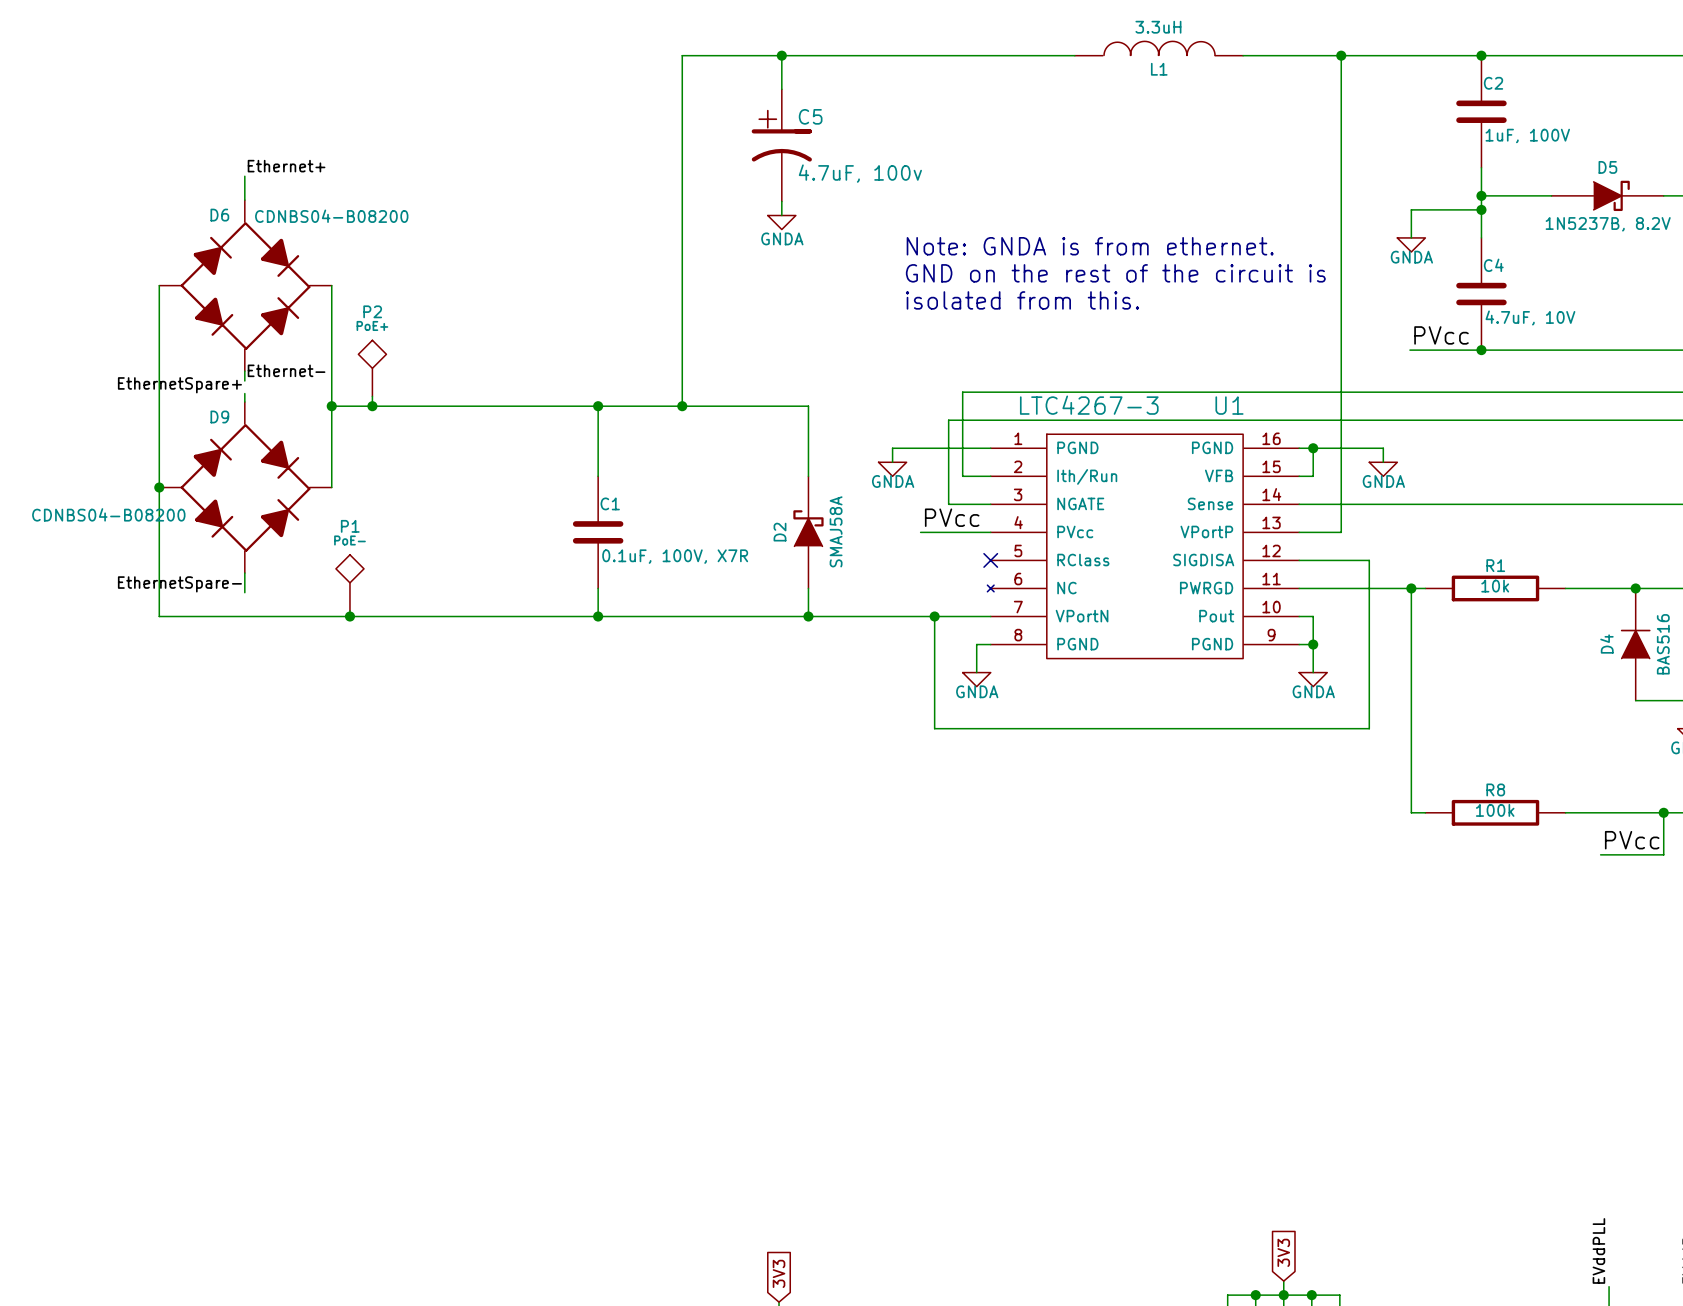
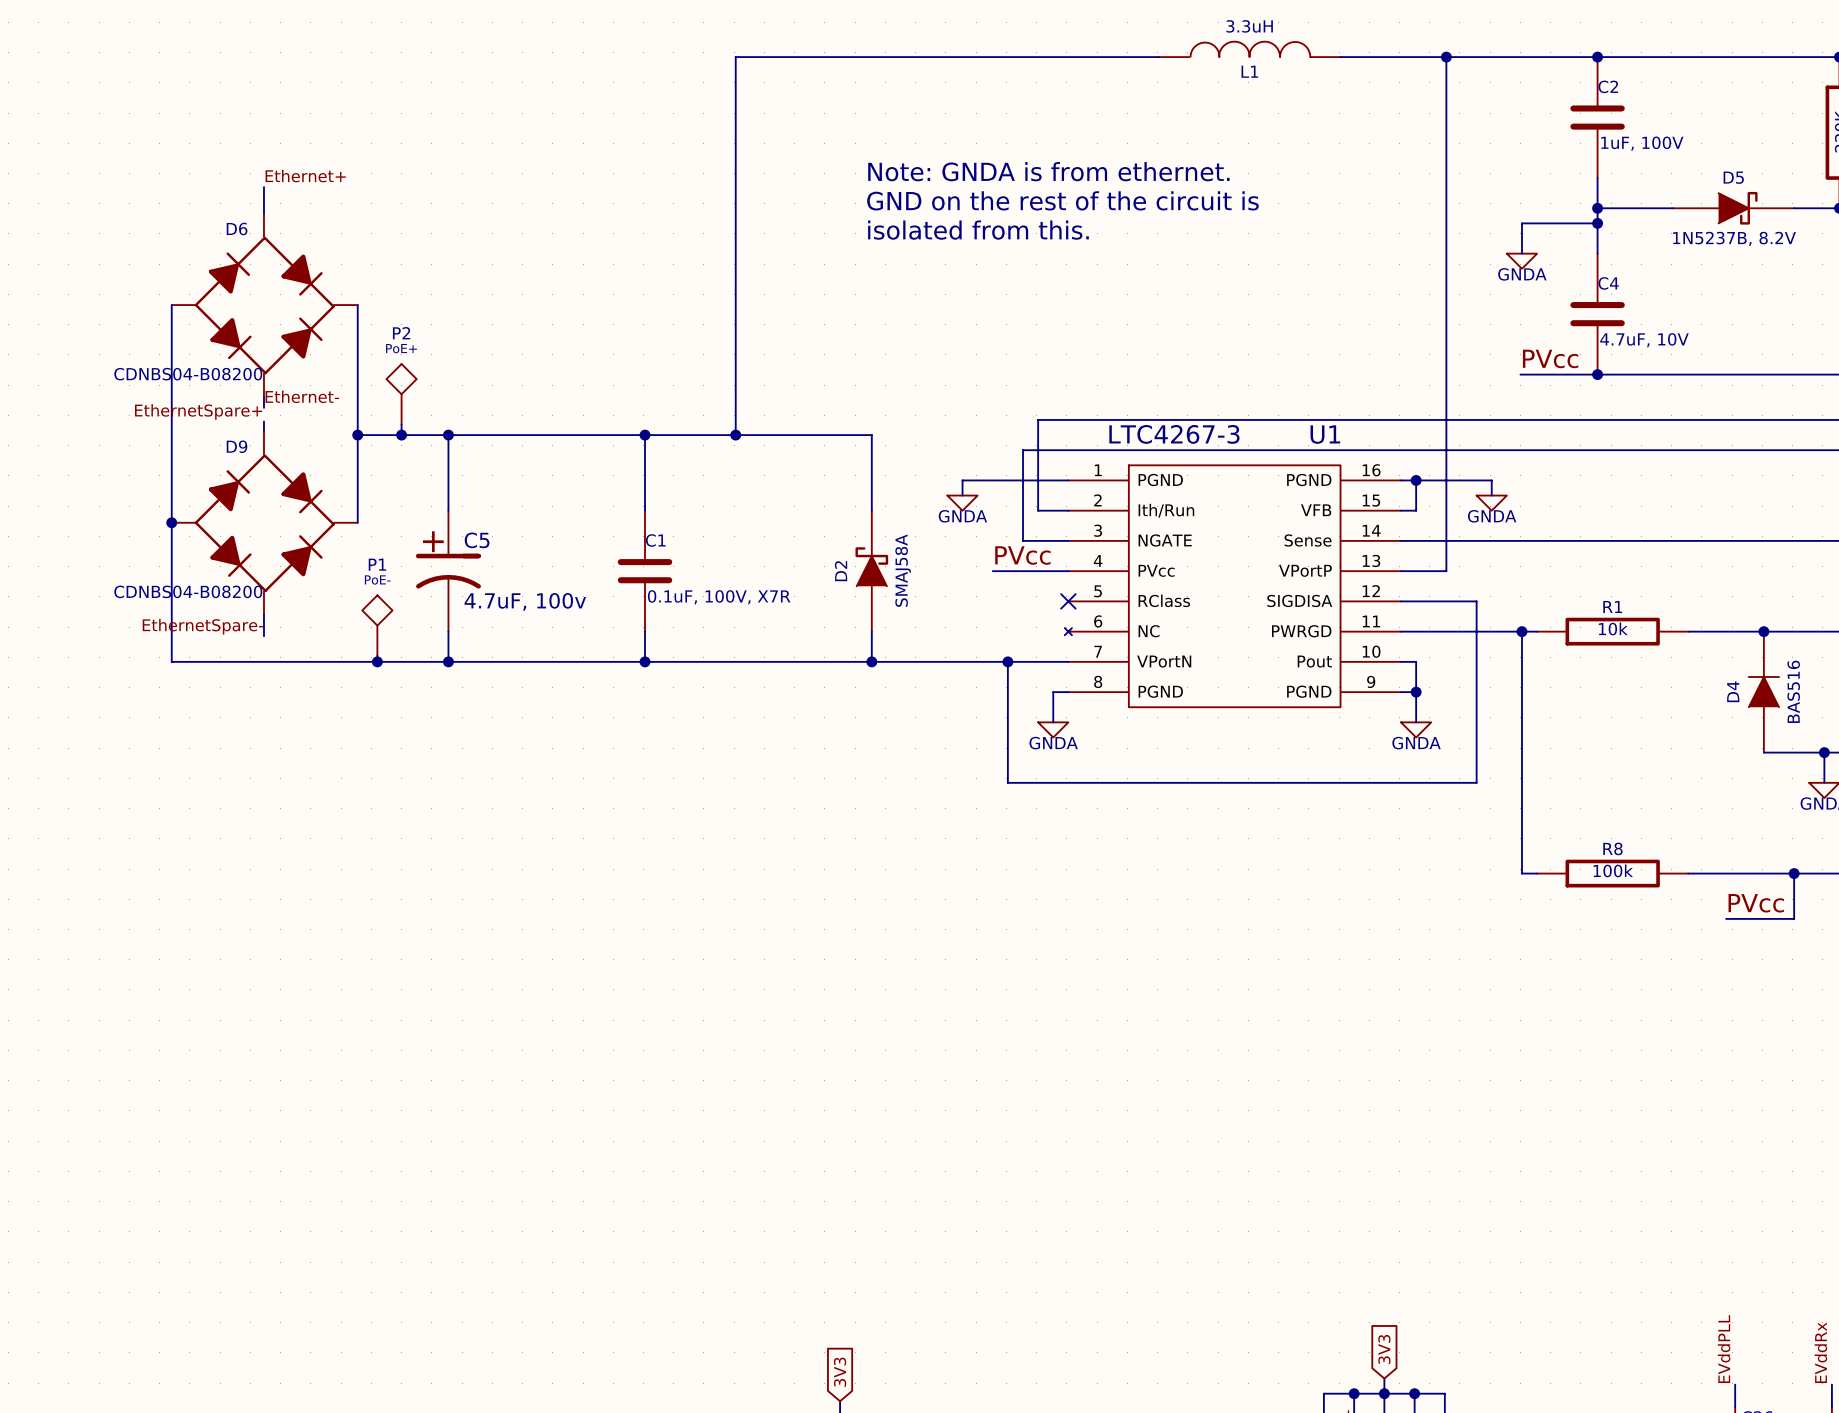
wire: (781, 55) (781, 89) -> none
junction: (781, 55) -> none
C5 position: (781, 145) -> (448, 571)
wire: (781, 201) (781, 215) -> none
D6 value position: CDNBS04-B08200 (331, 216) -> CDNBS04-B08200 (188, 374)
power symbol: GNDA (781, 222) -> none
text position: Note: GNDA is from ethernet. (1090, 246) -> Note: GNDA is from ethernet. (1048, 171)
text position: GND on the rest of the circuit is (1115, 273) -> GND on the rest of the circuit is (1062, 200)
text position: isolated from this. (1022, 300) -> isolated from this. (978, 230)
wire: none -> (448, 435) (448, 510)
junction: none -> (448, 435)
D9 value position: CDNBS04-B08200 (108, 514) -> CDNBS04-B08200 (188, 591)
wire: none -> (448, 631) (448, 661)
junction: none -> (448, 661)

